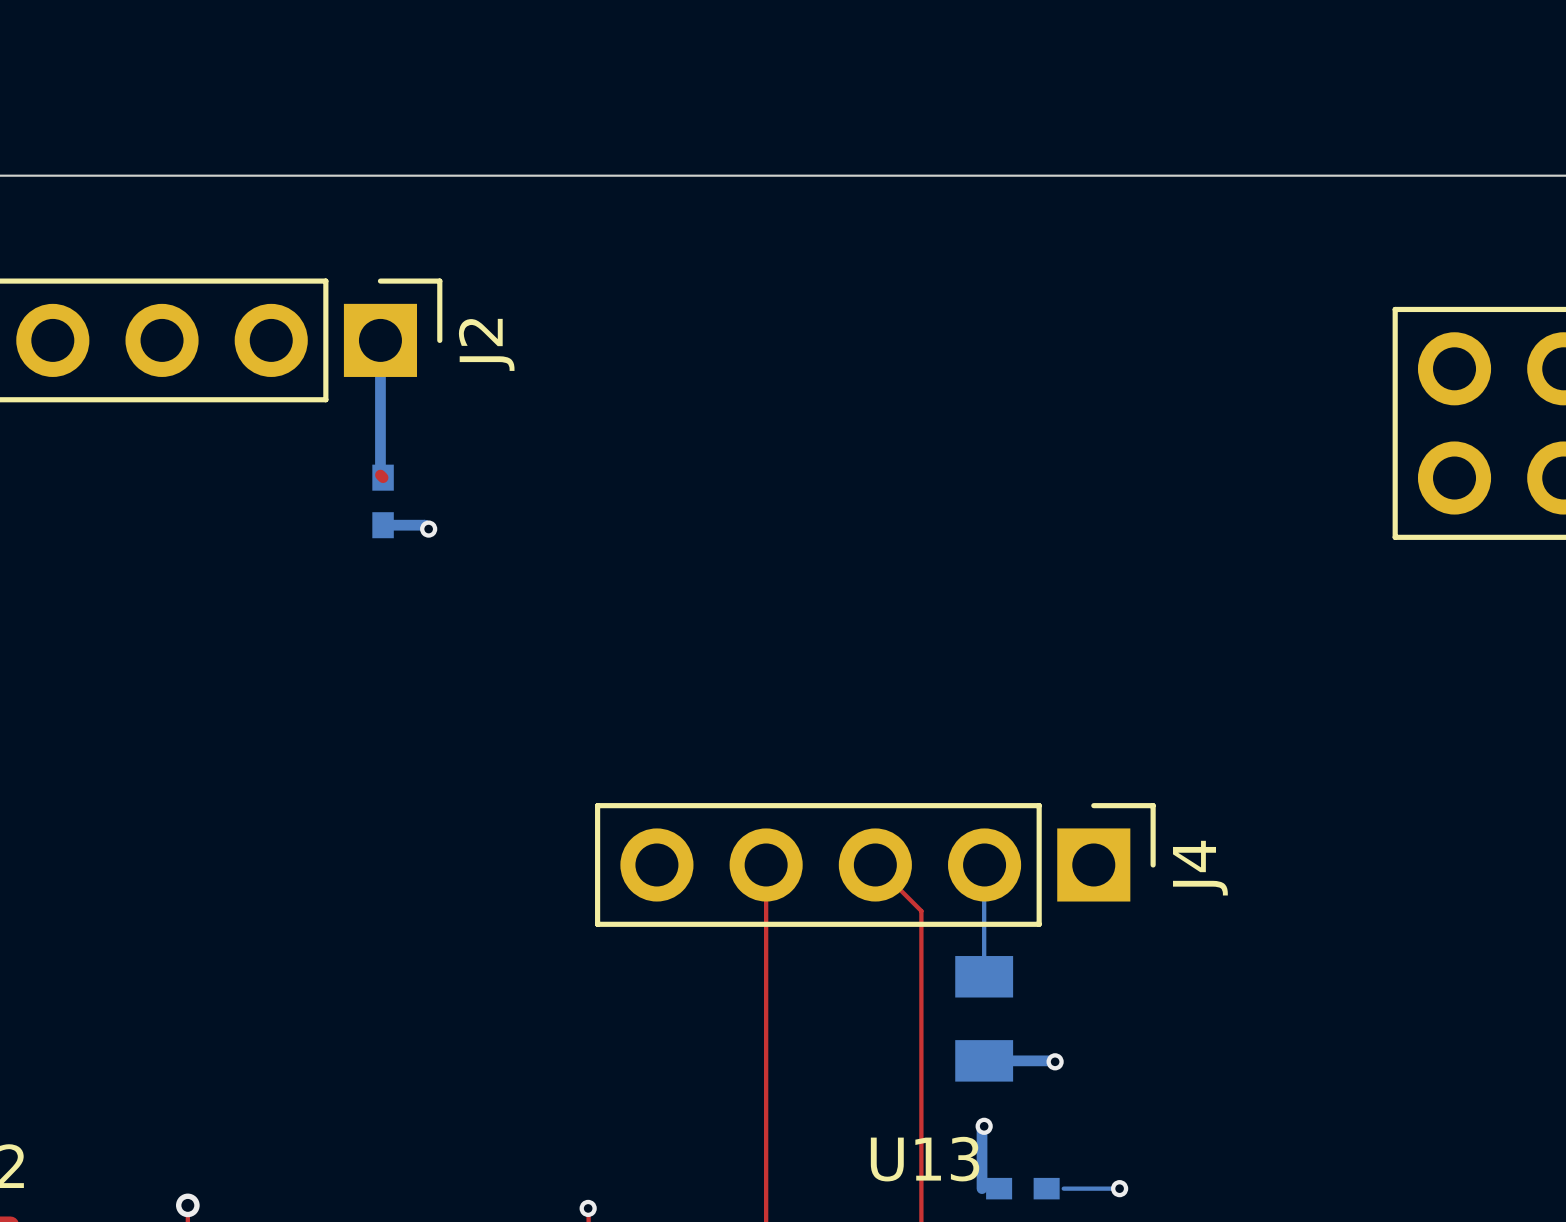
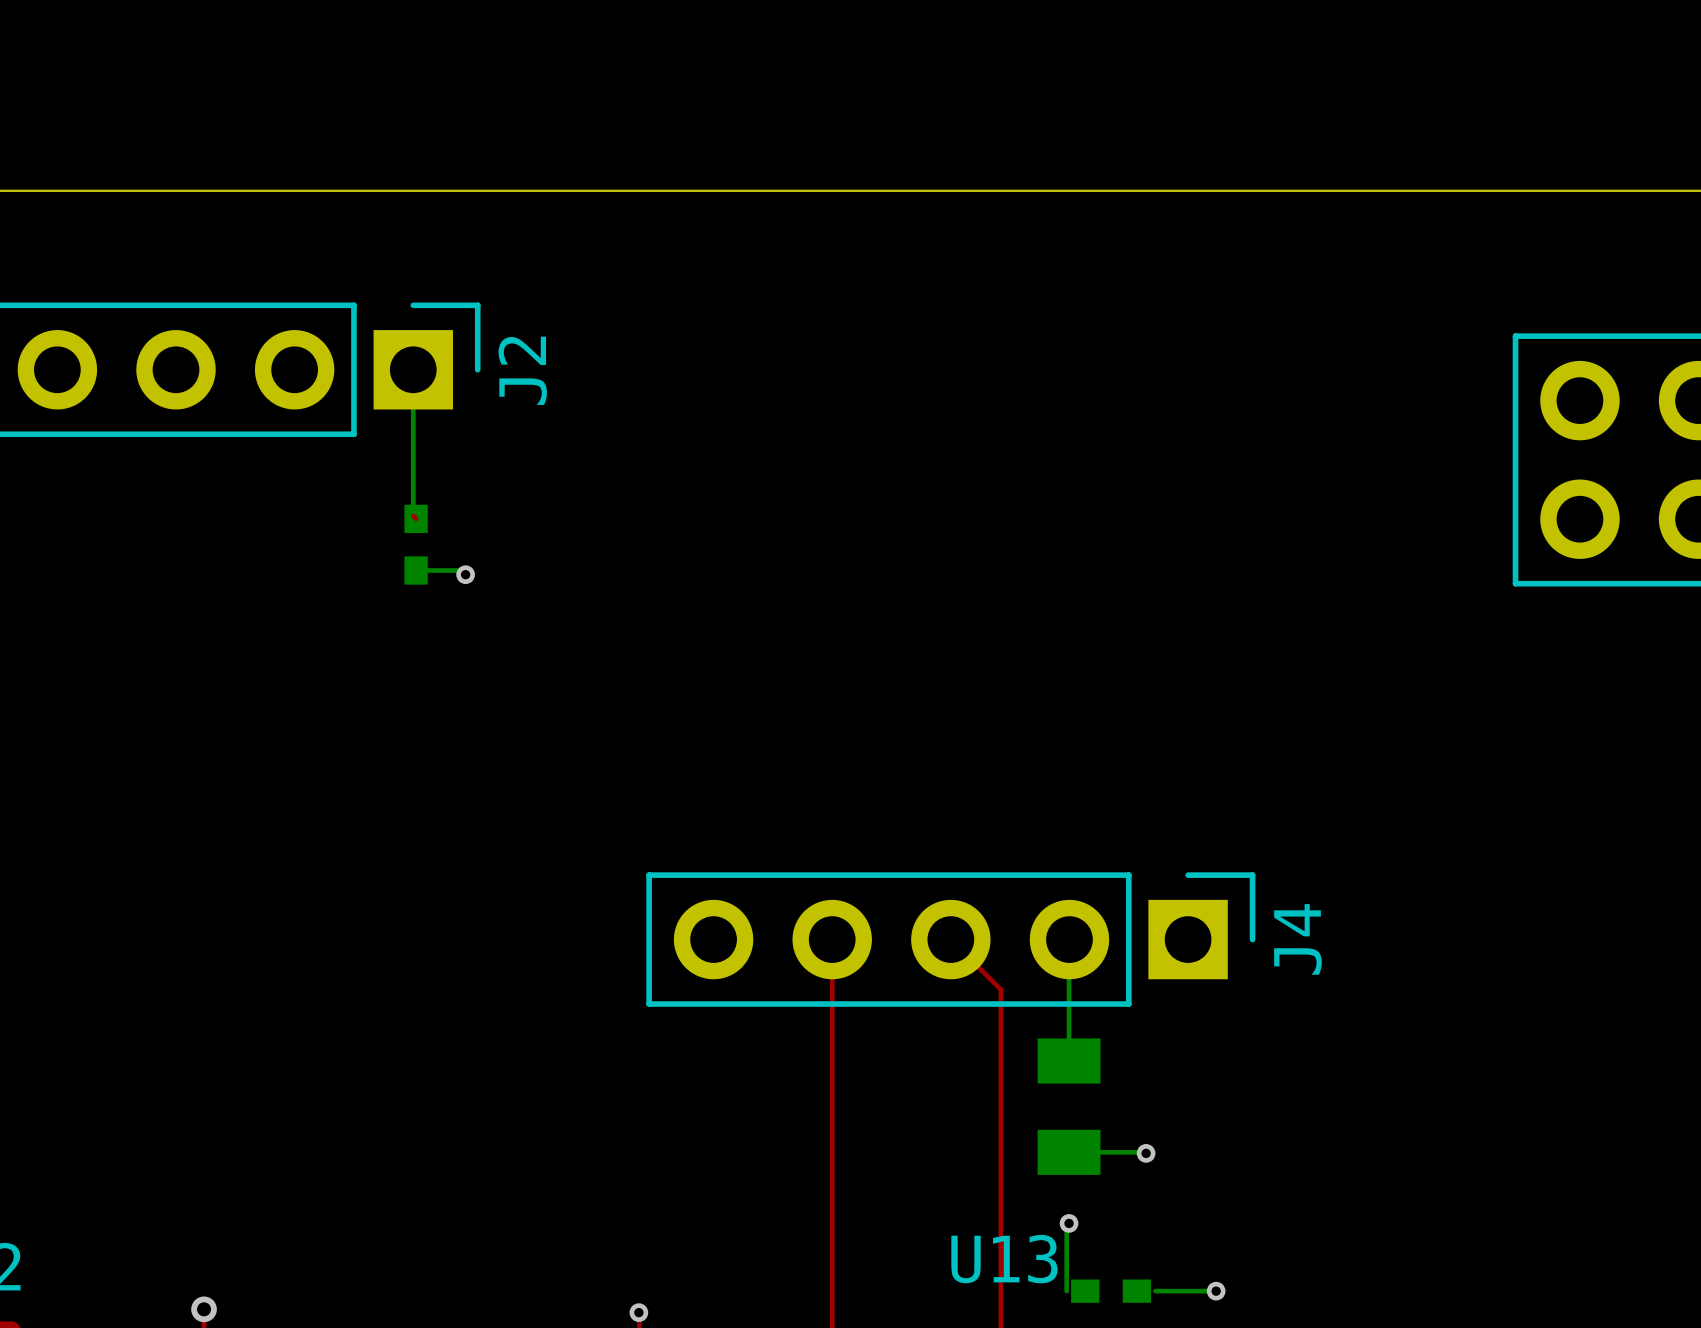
bottom track width: thick (380, 340) (380, 475) (383, 477) -> thin (413, 369) (413, 516) (416, 518)
top track width: thick (380, 475) (383, 477) -> thin (413, 516) (416, 518)
bottom track width: thick (383, 525) (424, 525) (428, 529) -> thin (416, 570) (461, 570) (465, 574)
bottom track width: thick (984, 1060) (1055, 1061) -> thin (1069, 1152) (1146, 1153)
bottom track width: thick (984, 1126) (982, 1128) (982, 1188) -> thin (1069, 1223) (1066, 1225) (1066, 1291)

